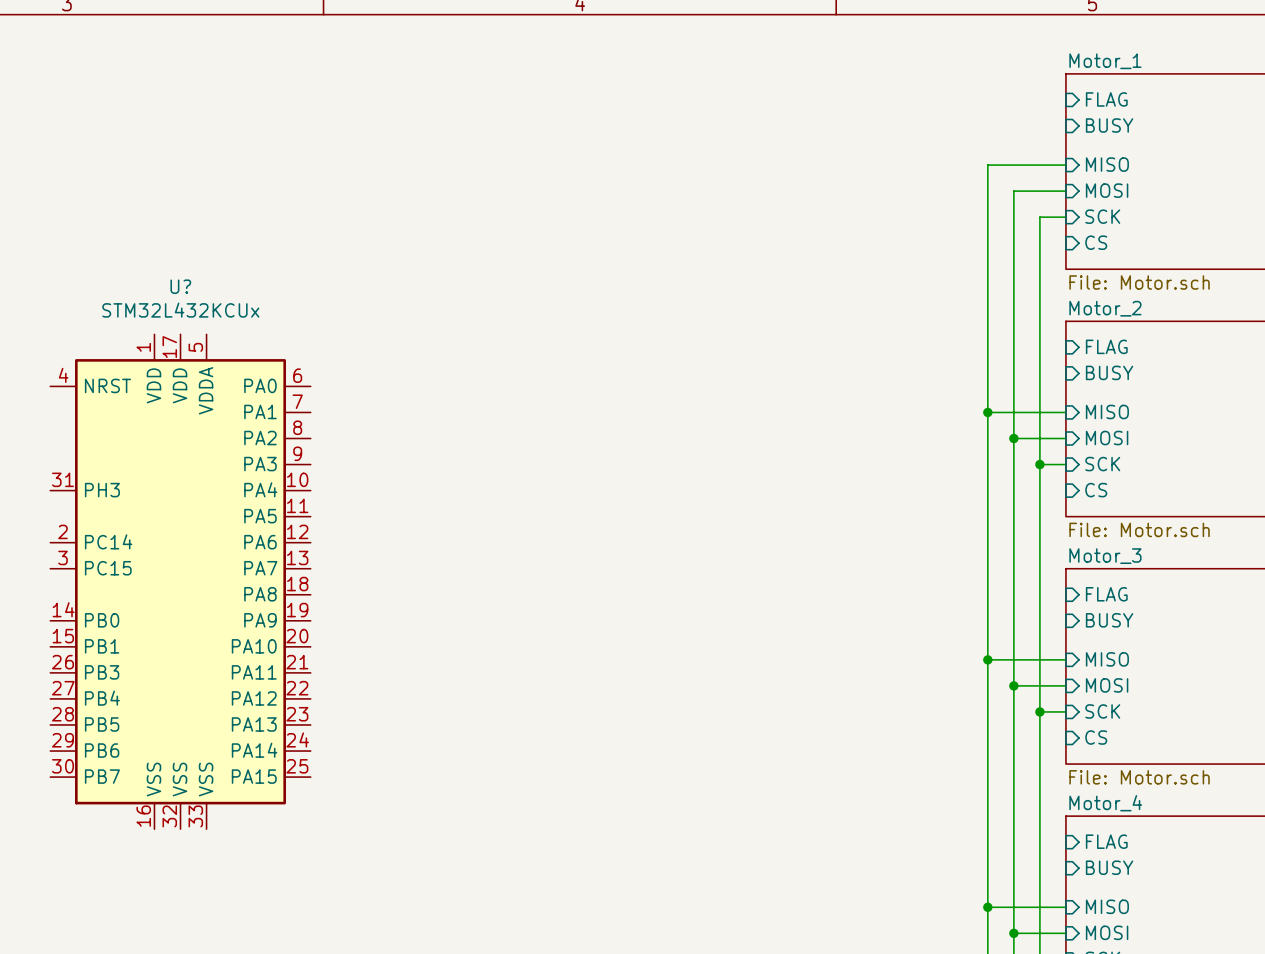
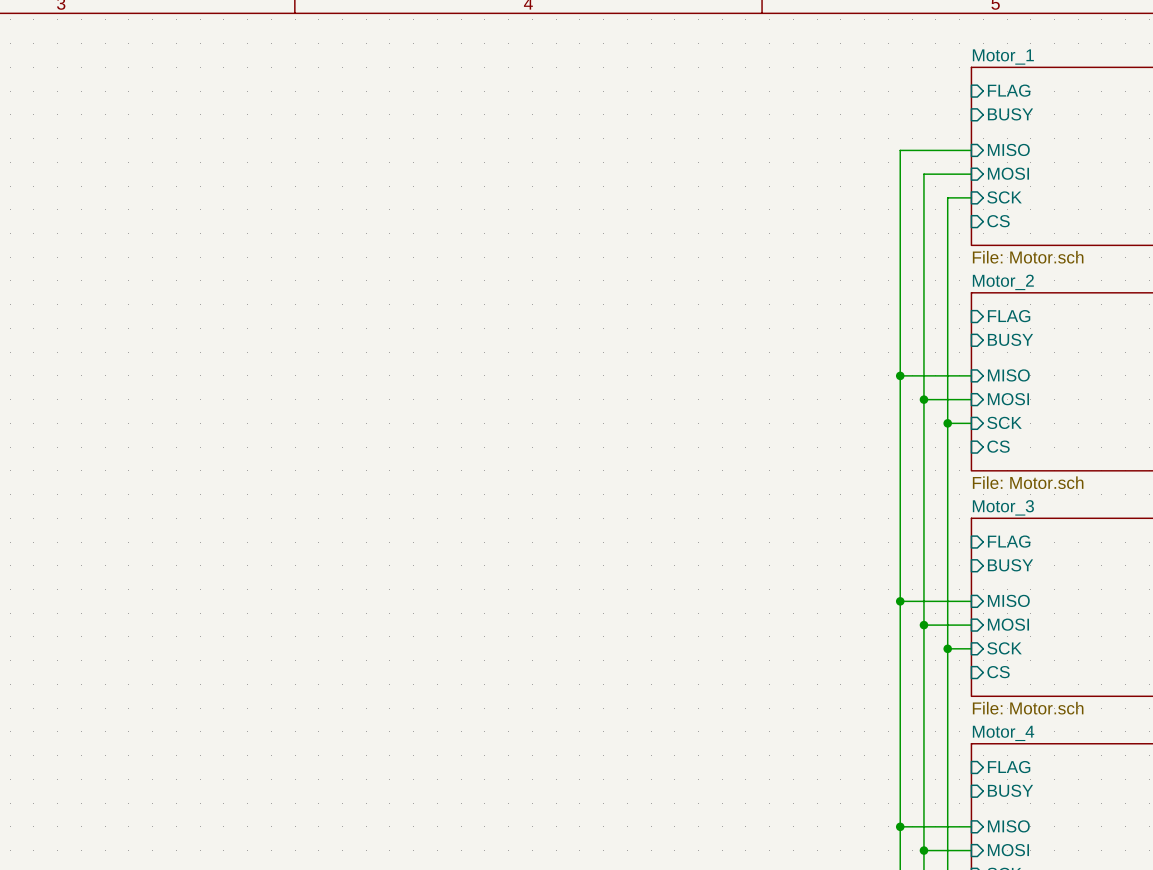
U?: STM32L432KCUx (180, 581) -> none

